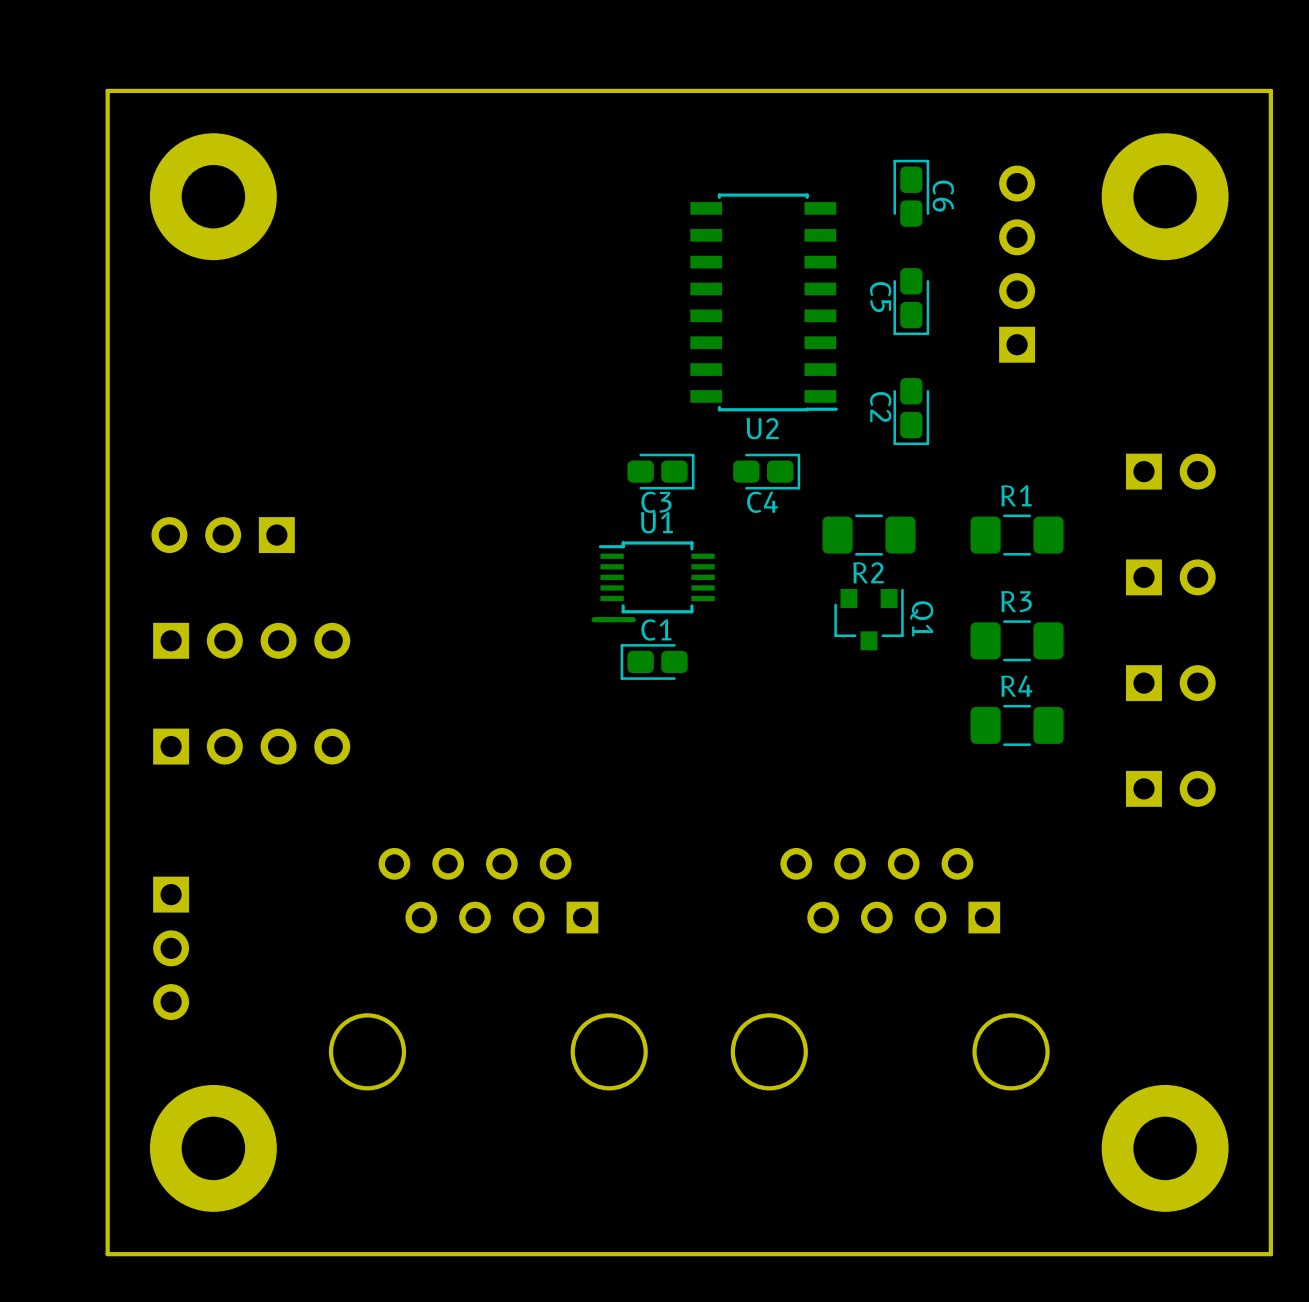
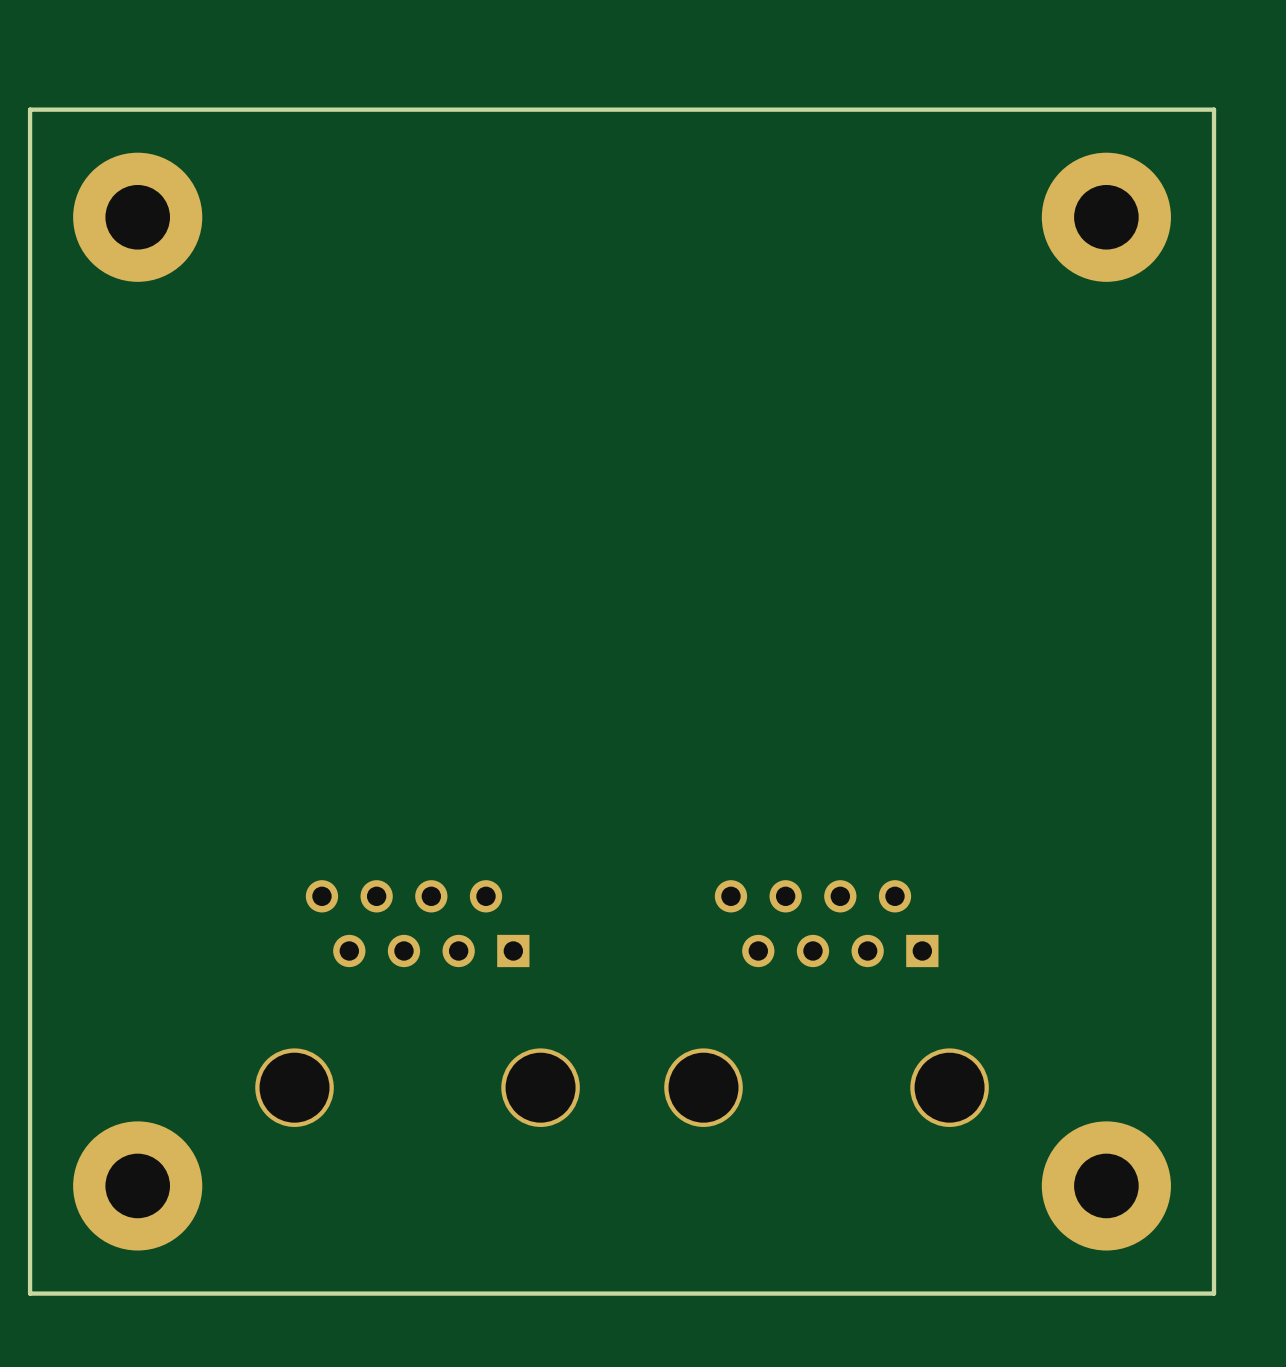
C6: (911, 193) -> none
part: (1017, 264) -> none
C5: (911, 301) -> none
U2: (764, 302) -> none
C2: (911, 411) -> none
C3: (660, 471) -> none
C4: (766, 471) -> none
part: (1170, 471) -> none
part: (223, 535) -> none
R2: (869, 535) -> none
R1: (1017, 535) -> none
U1: (656, 577) -> none
part: (1170, 577) -> none
track: (633, 619) (594, 619) -> none
Q1: (869, 619) -> none
part: (251, 640) -> none
R3: (1017, 640) -> none
C1: (654, 661) -> none
part: (1170, 683) -> none
R4: (1017, 725) -> none
part: (251, 746) -> none
part: (1170, 788) -> none
part: (171, 948) -> none

